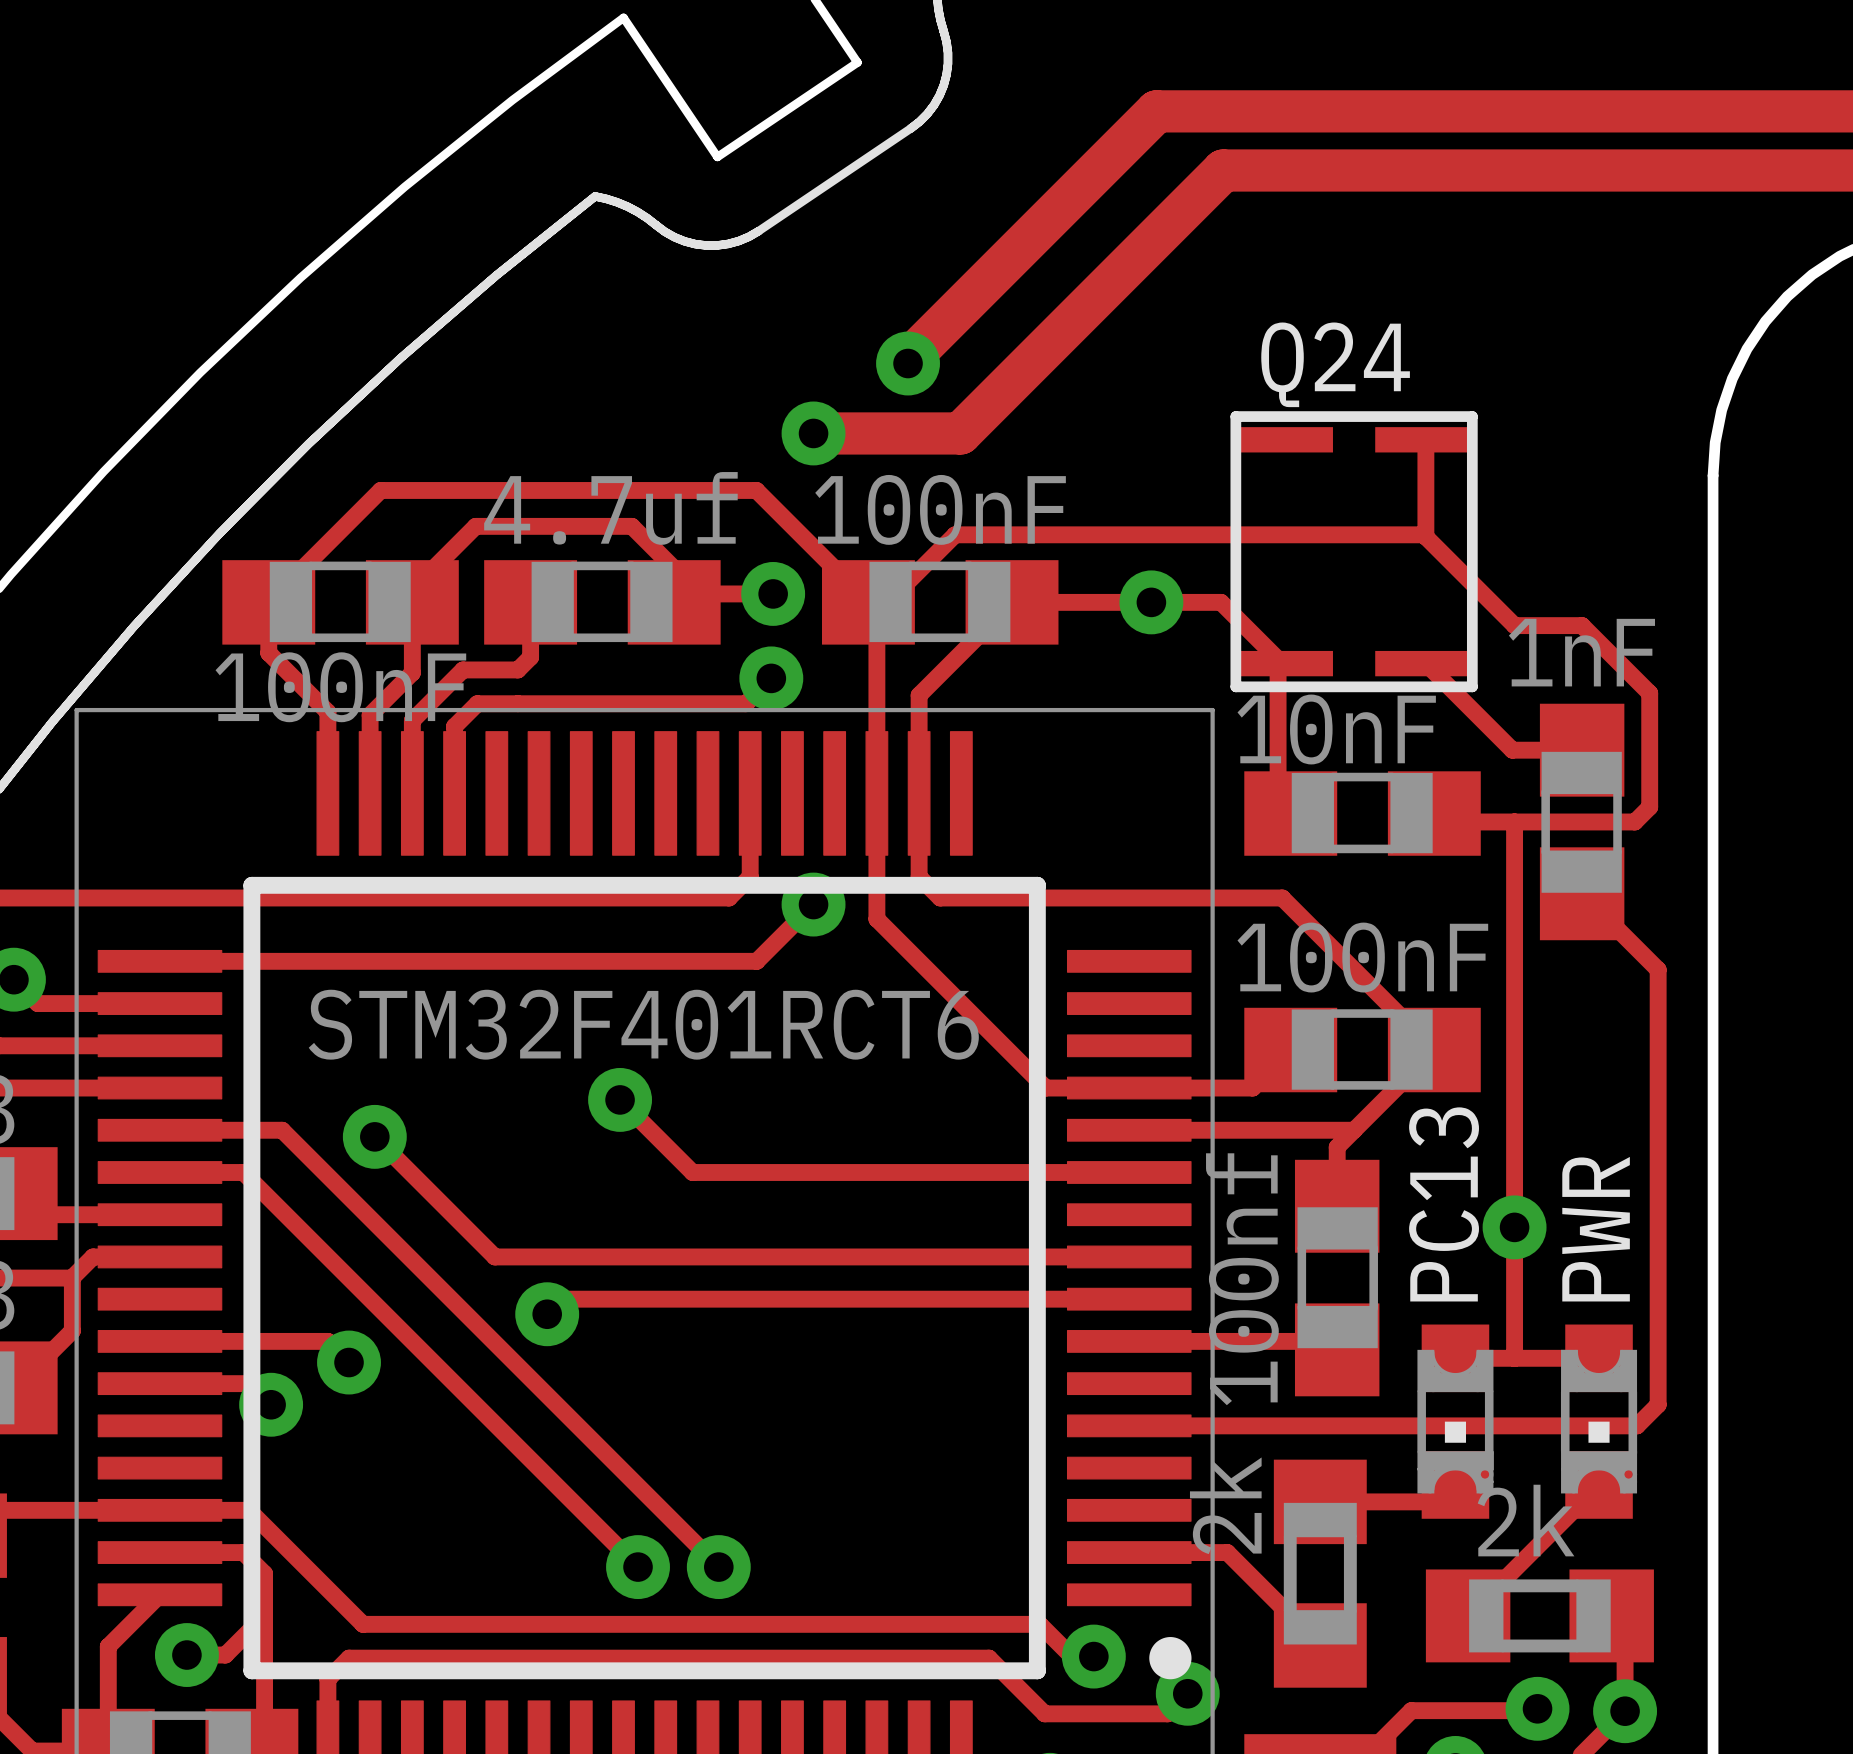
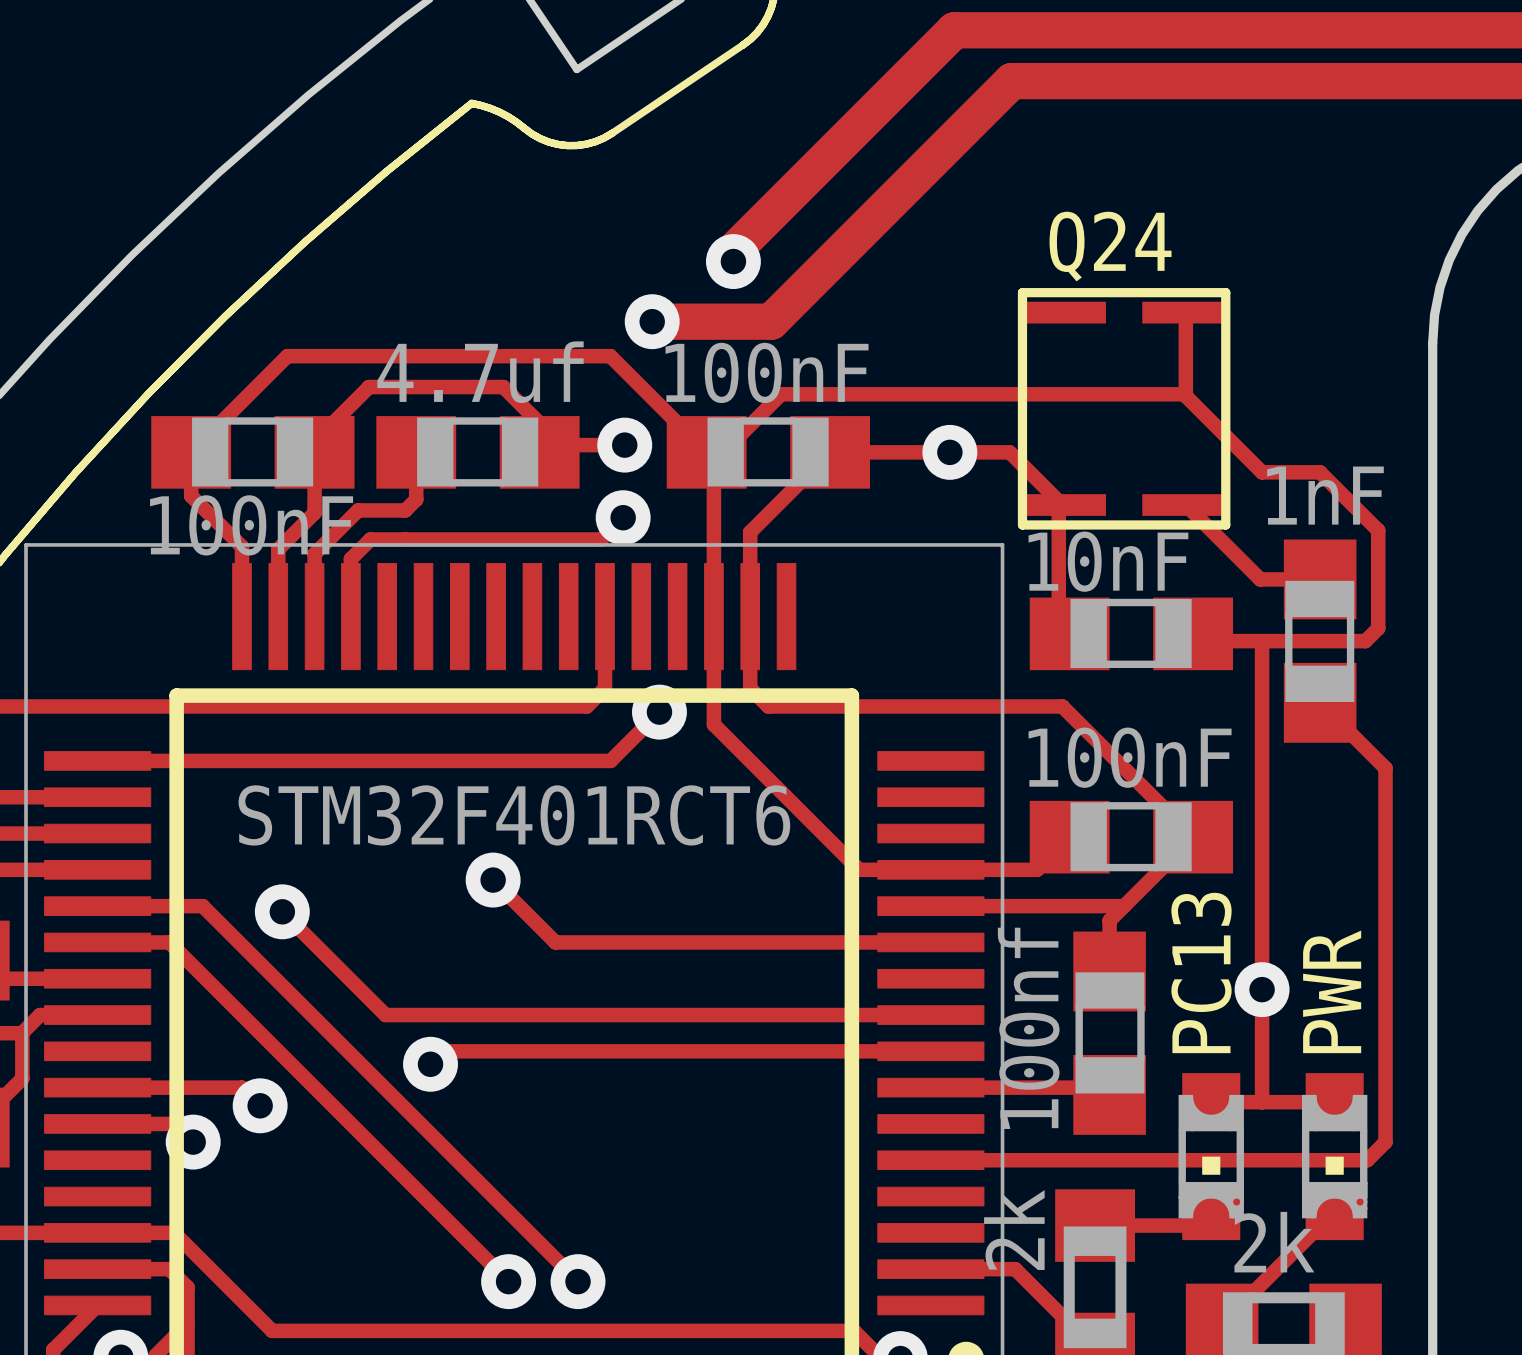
via position: (908, 363) -> (733, 261)
track: (813, 433) (960, 433) -> (652, 321) (771, 321) (785, 307)
via position: (813, 433) -> (652, 321)

